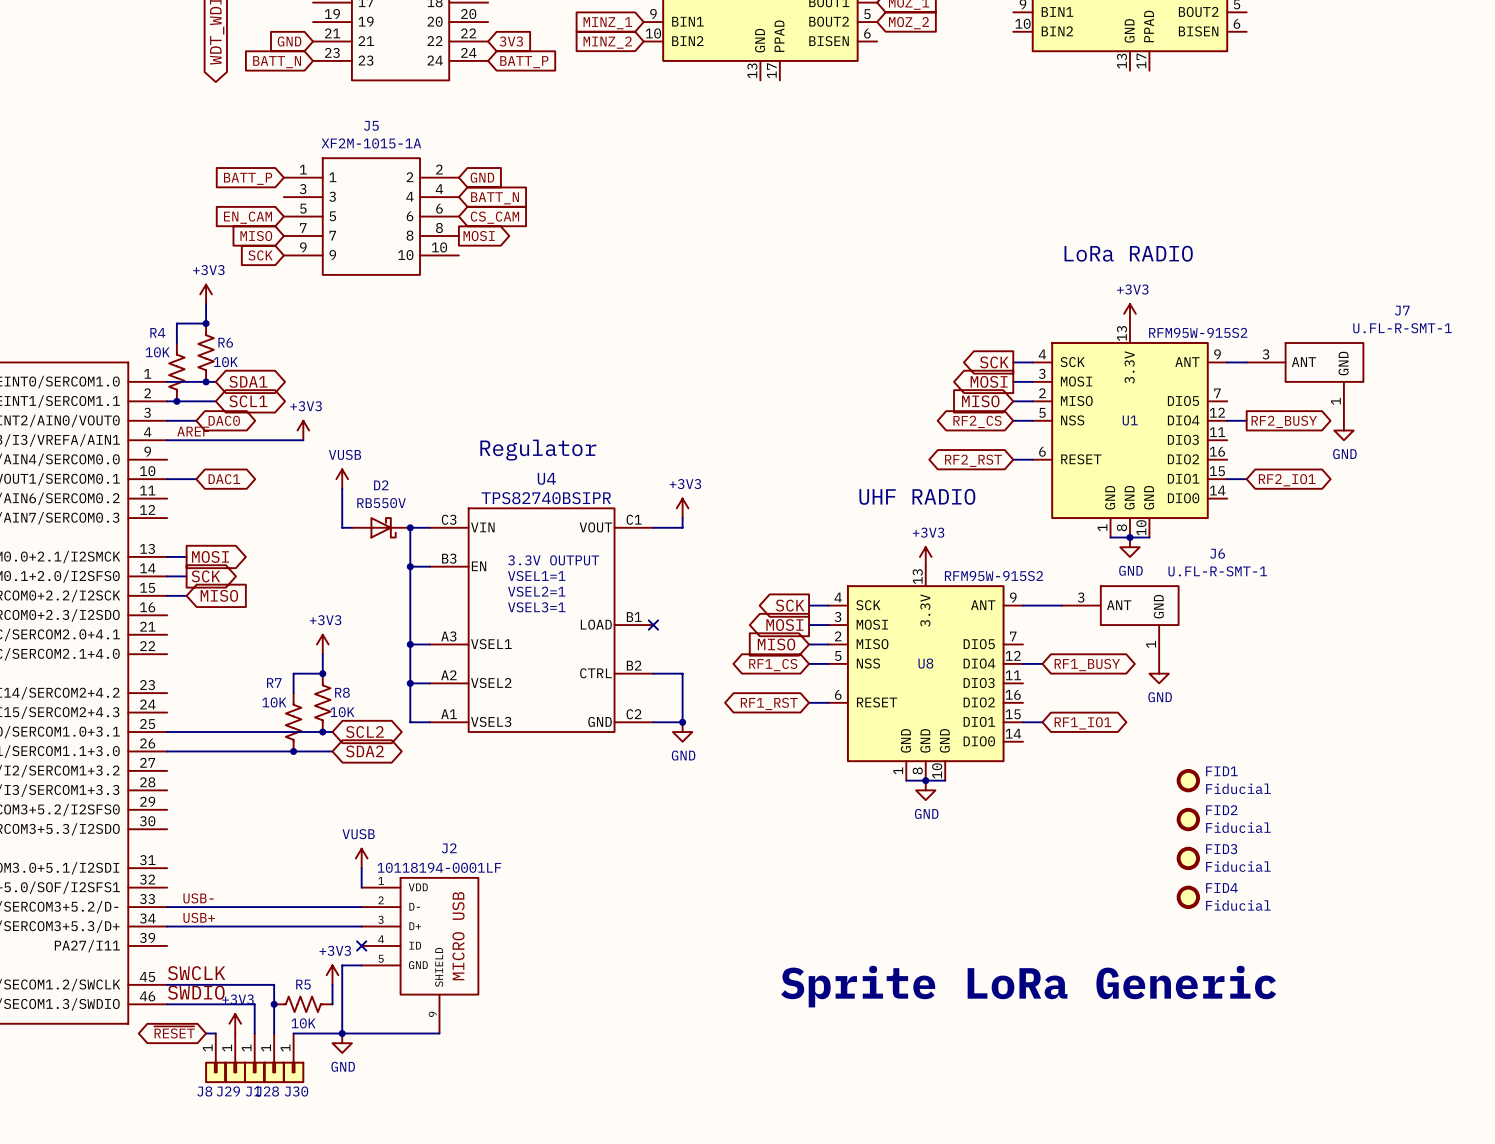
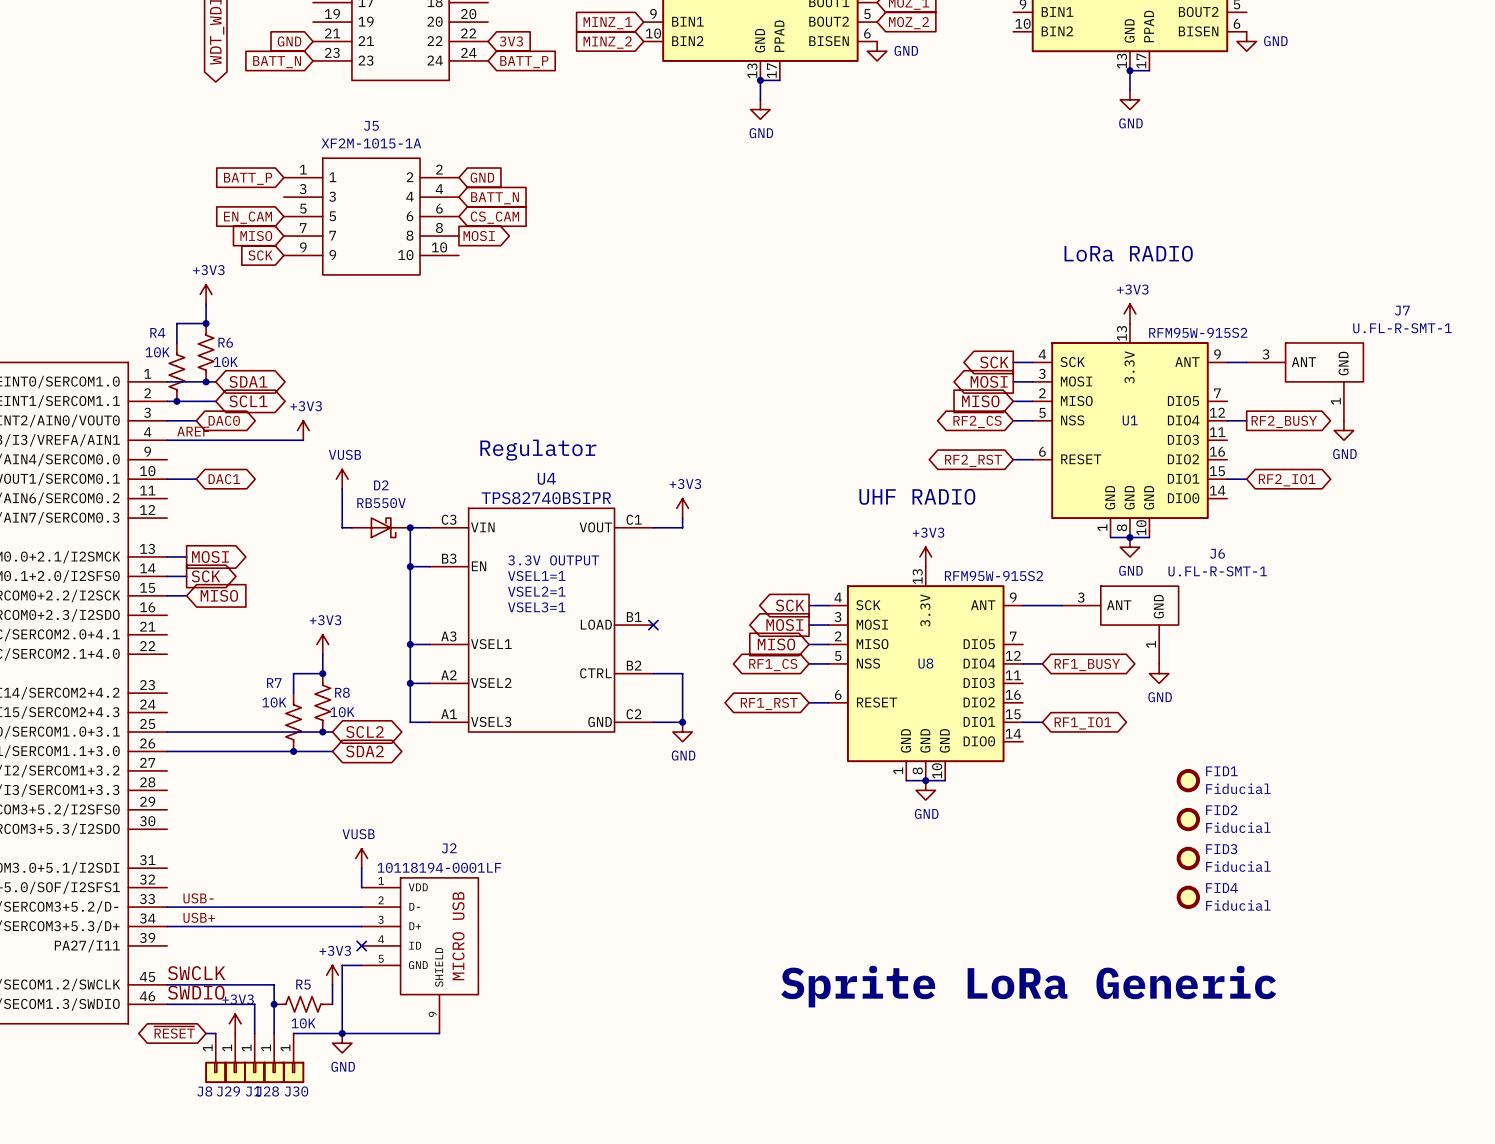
power symbol: none -> GND (1246, 41)
power symbol: none -> GND (877, 51)
junction: none -> (1129, 70)
wire: none -> (1149, 70) (1129, 70) (1129, 90)
junction: none -> (760, 80)
wire: none -> (779, 80) (760, 80) (760, 99)
power symbol: none -> GND (1129, 99)
power symbol: none -> GND (760, 109)

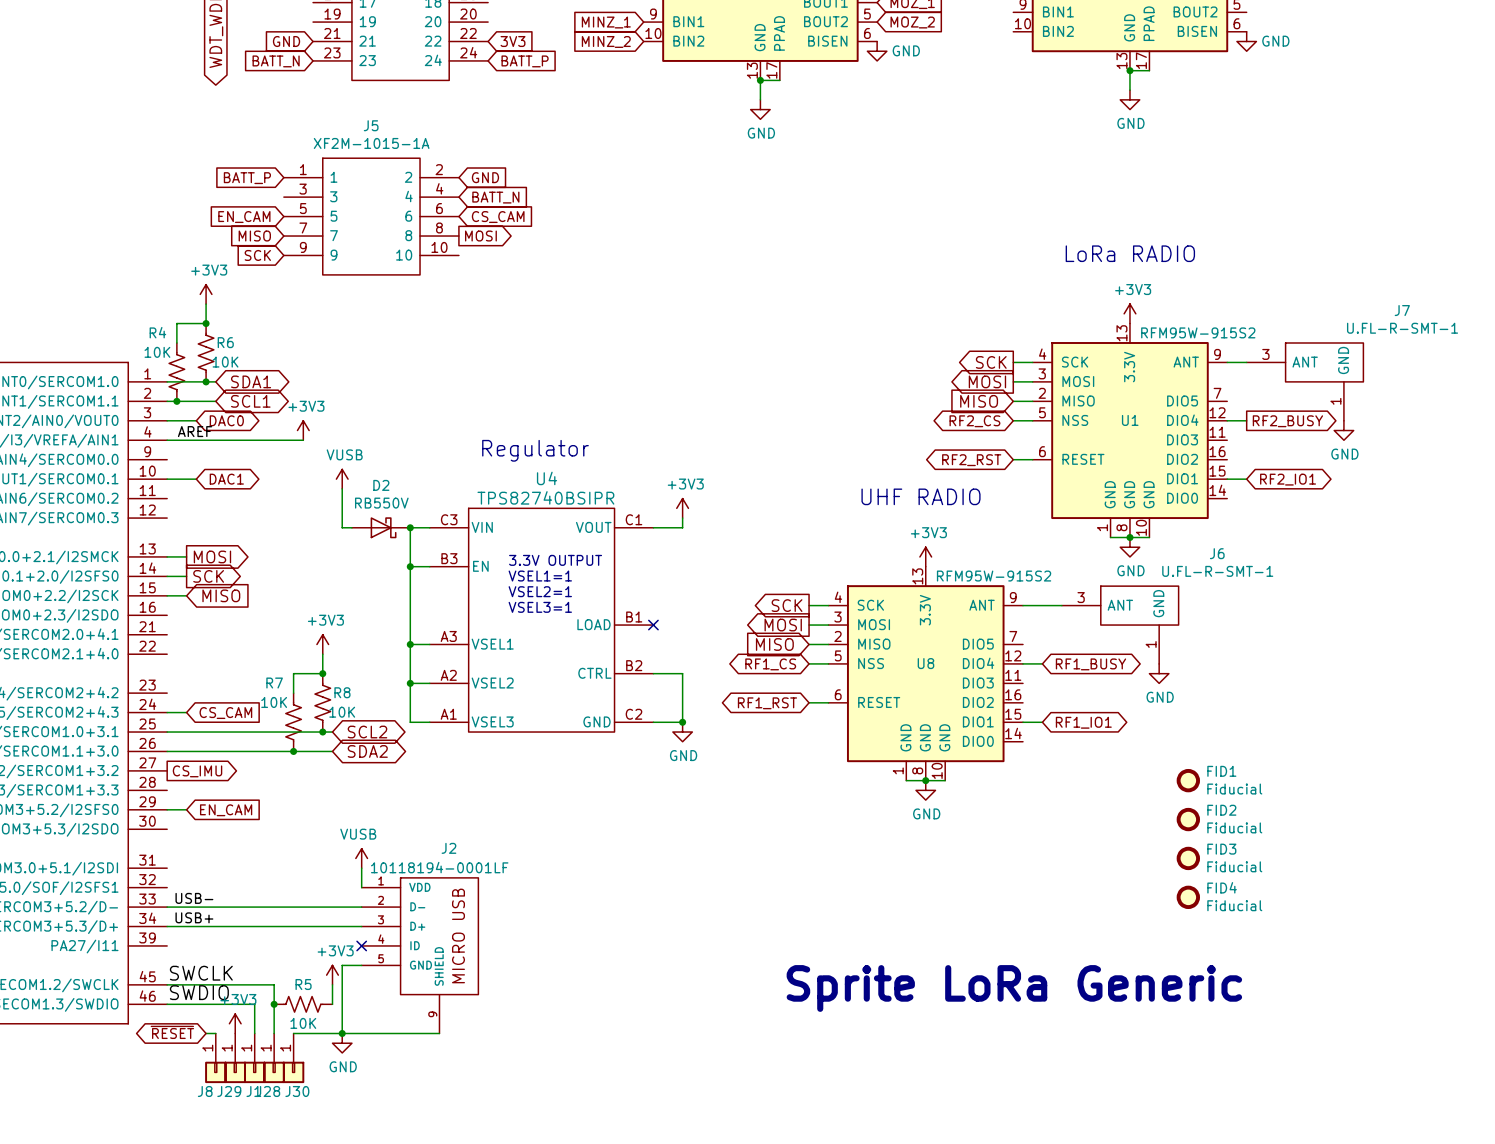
wire: none -> (167, 712) (186, 712)
global label: none -> CS_CAM (225, 713)
global label: none -> CS_IMU (197, 771)
wire: none -> (167, 809) (186, 809)
global label: none -> EN_CAM (226, 810)

